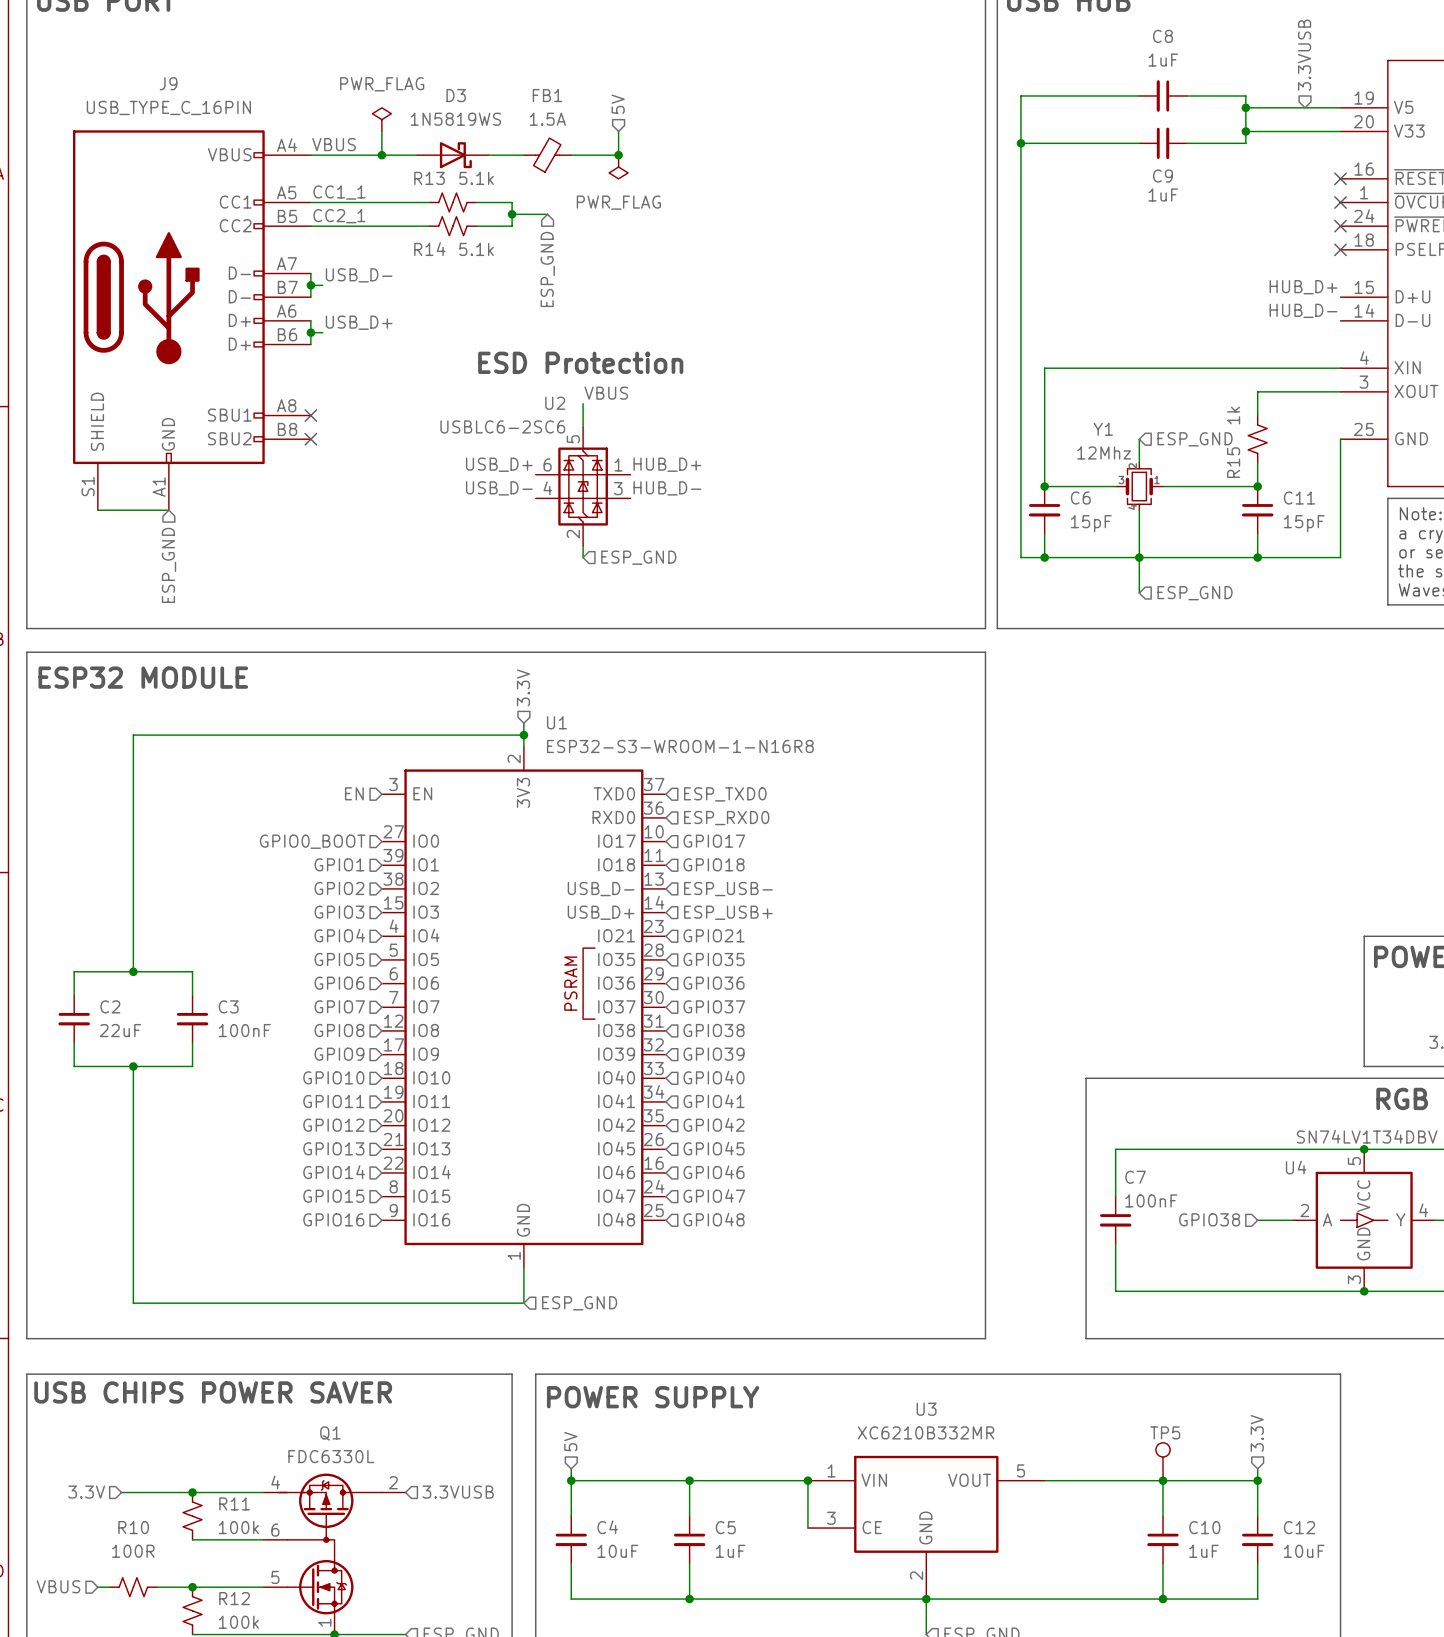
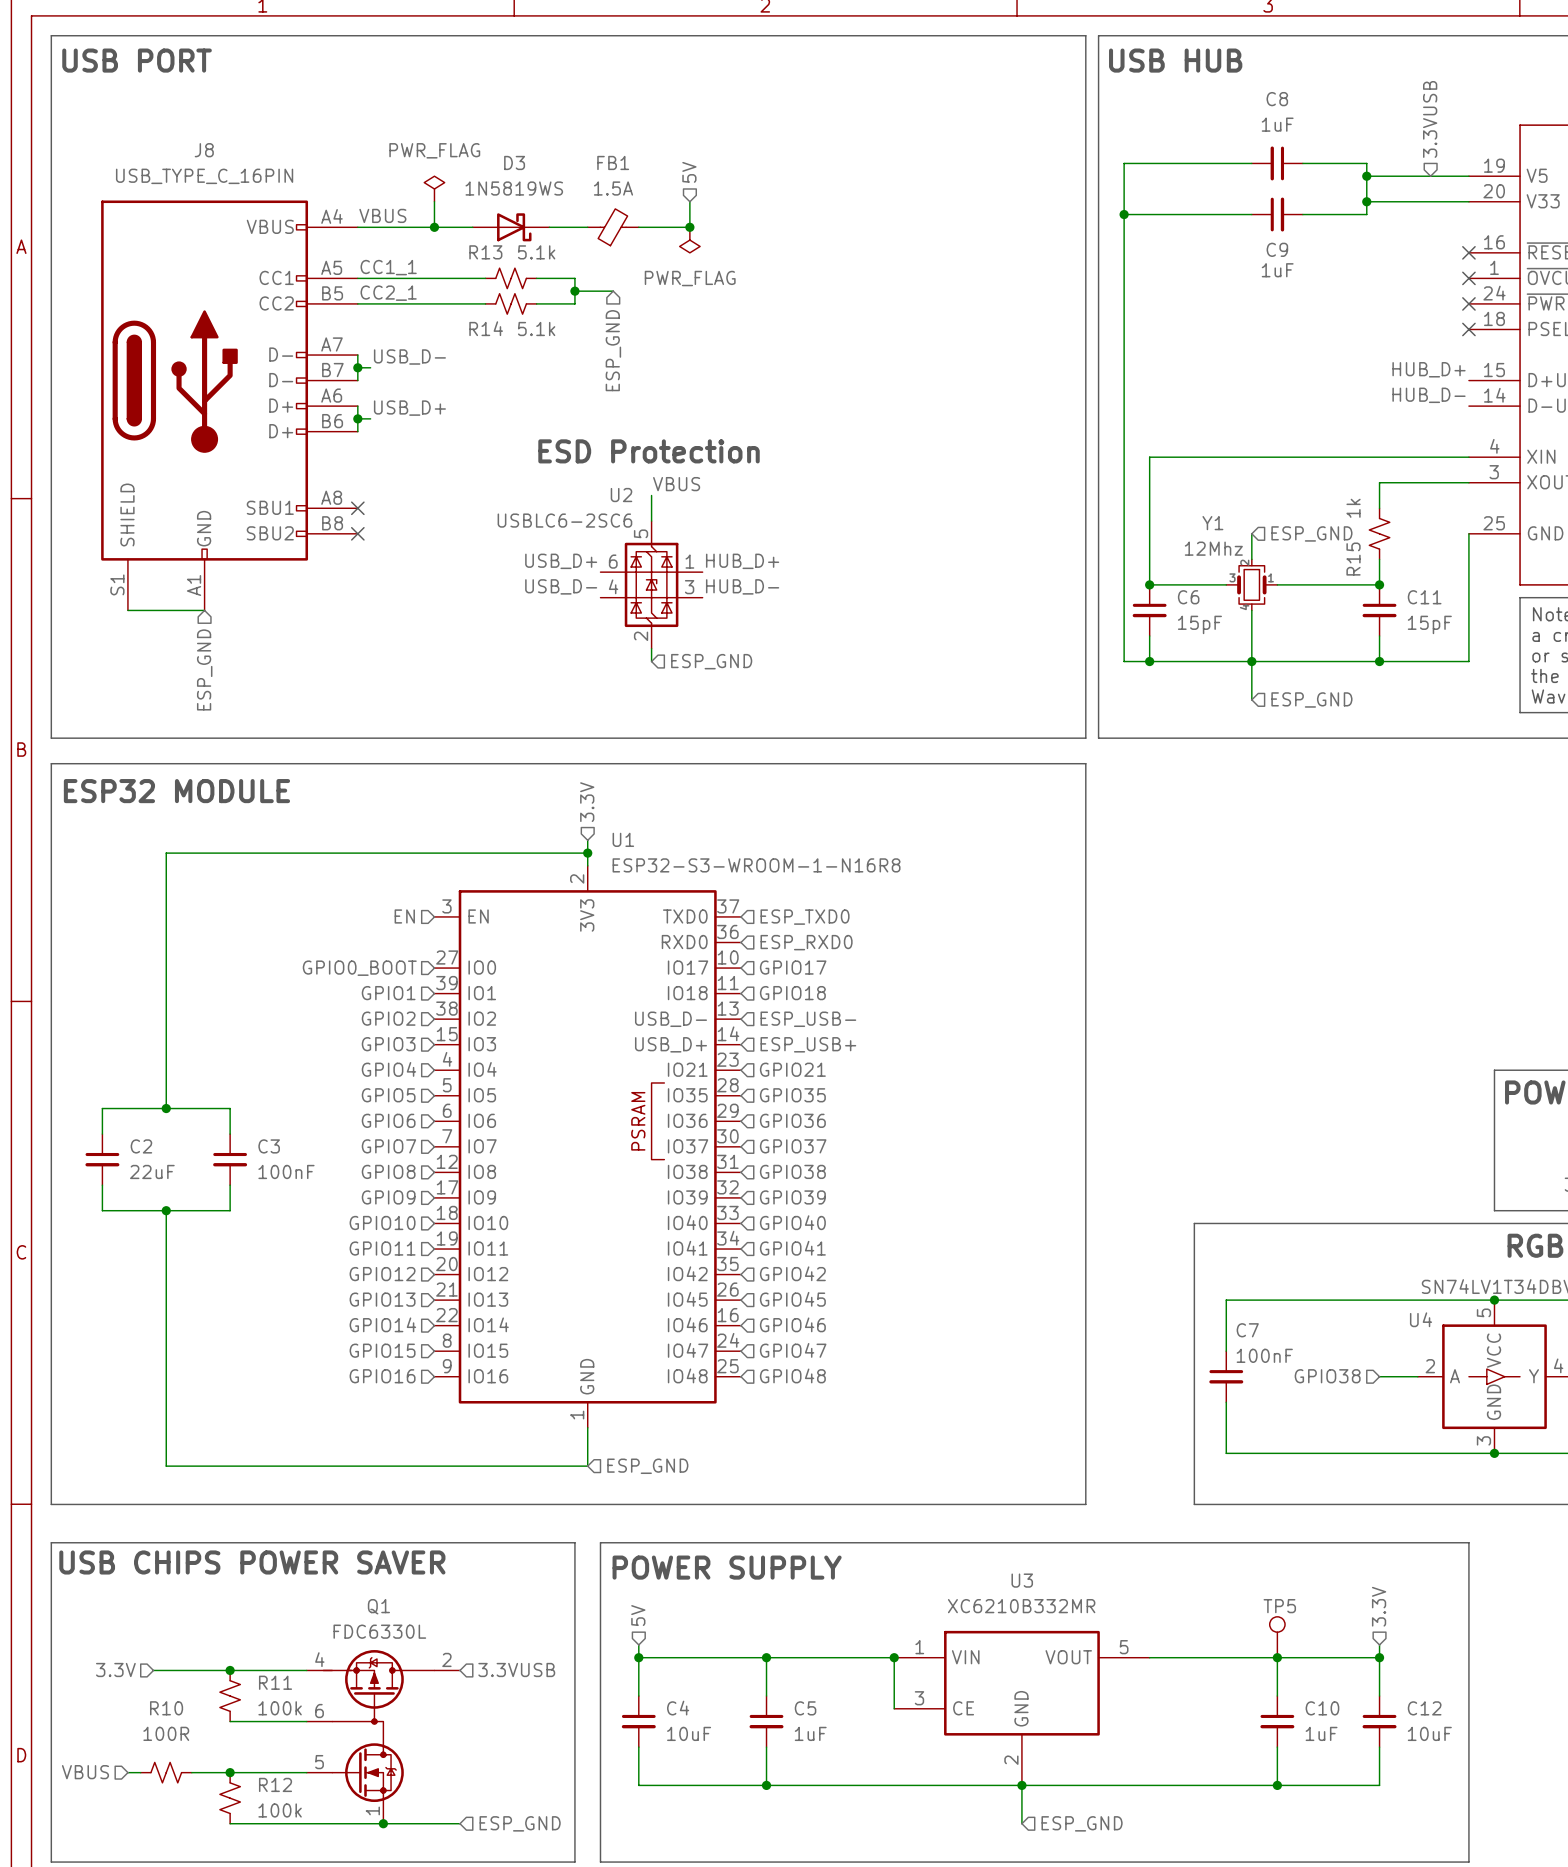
J9 name: J9 (168, 83) -> J8 (204, 150)

